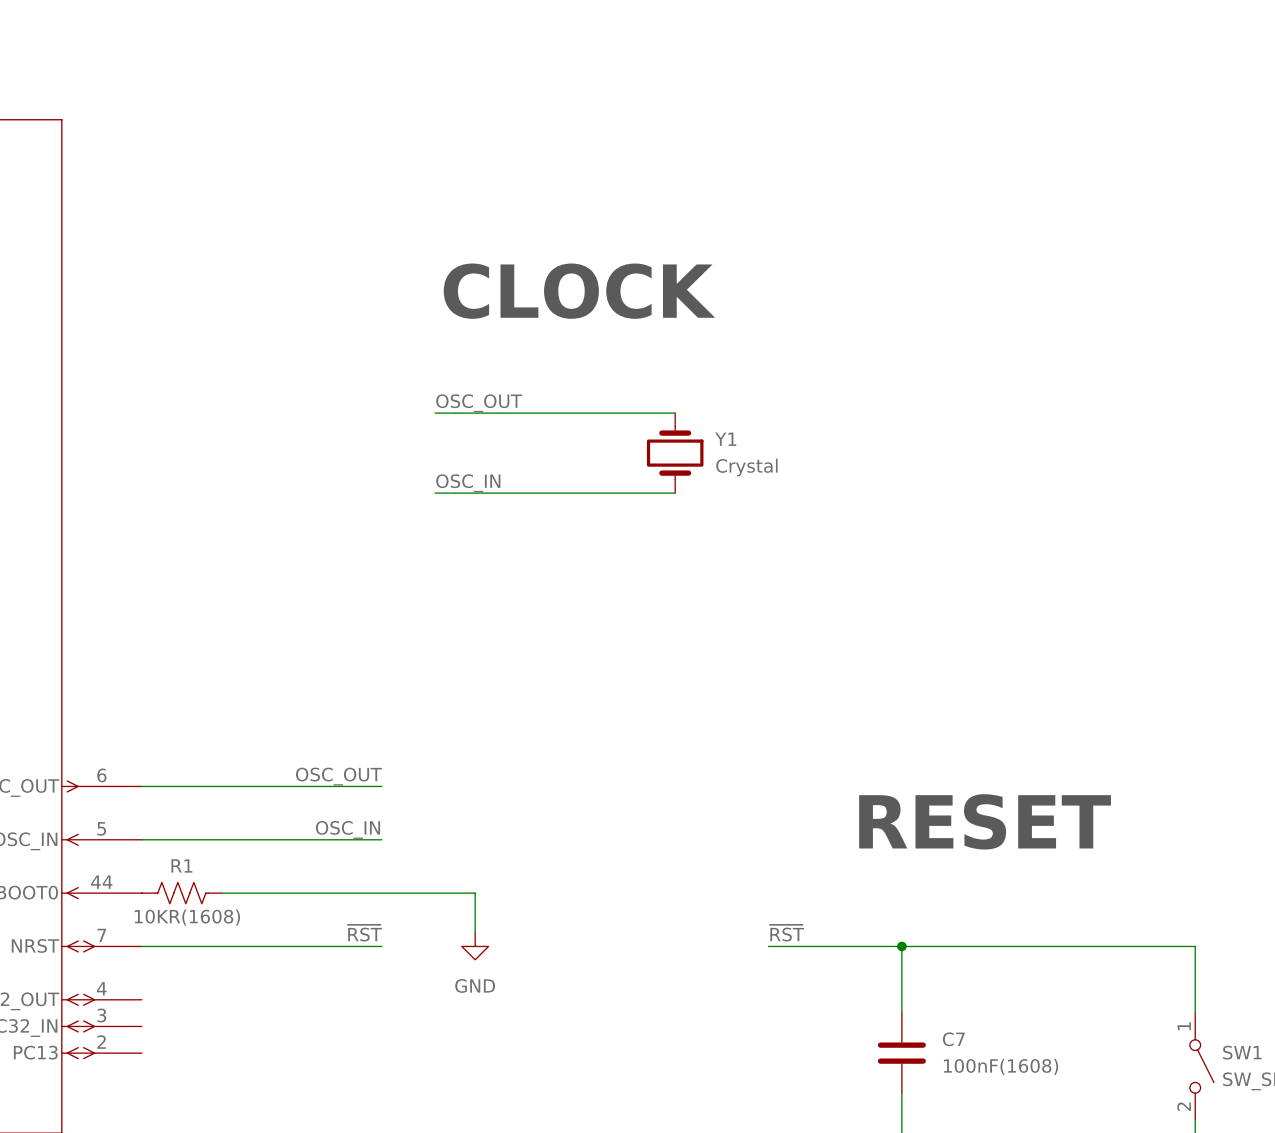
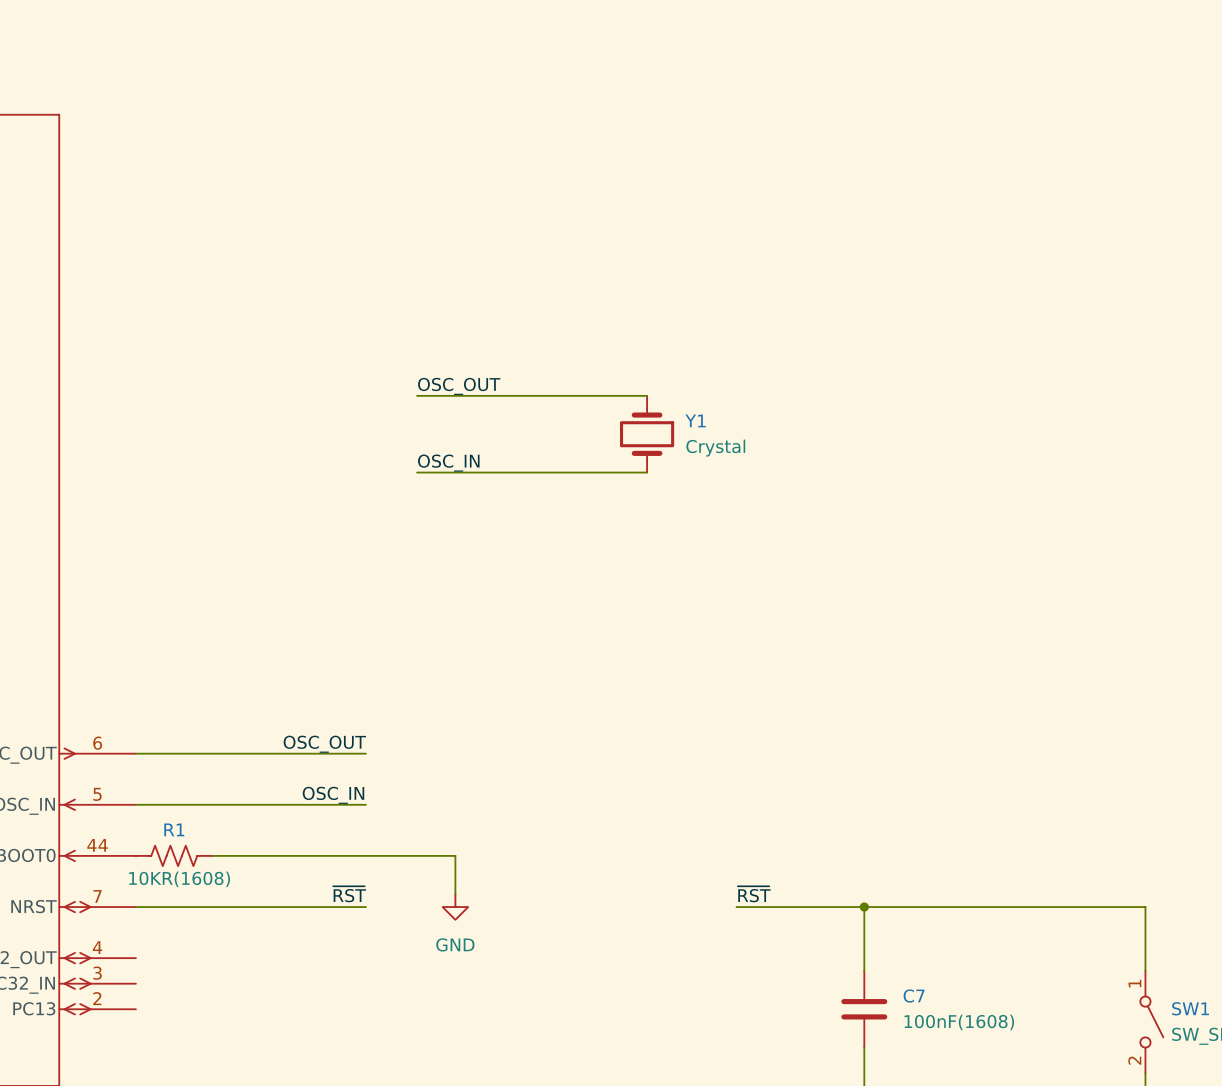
text: CLOCK (579, 291) -> none
text: RESET (985, 821) -> none

